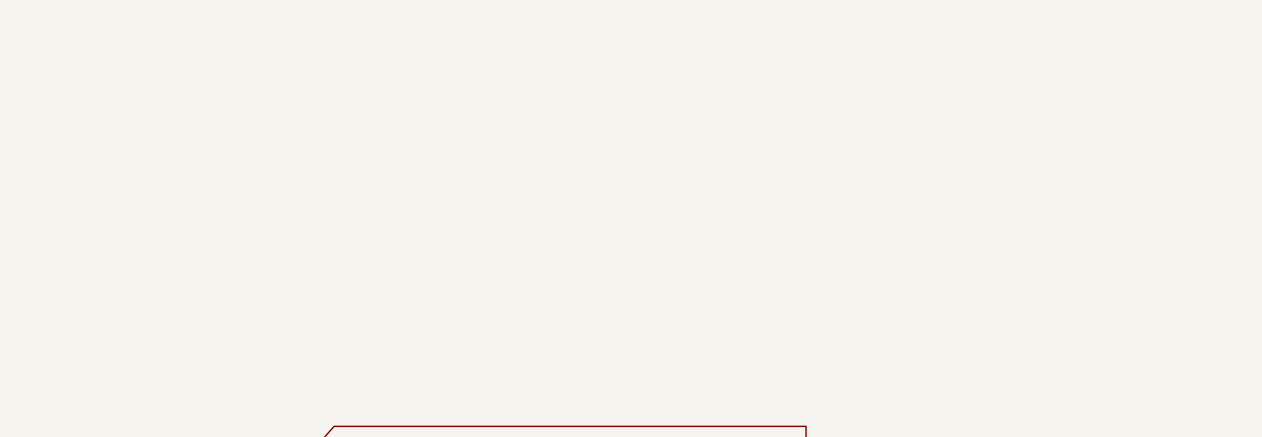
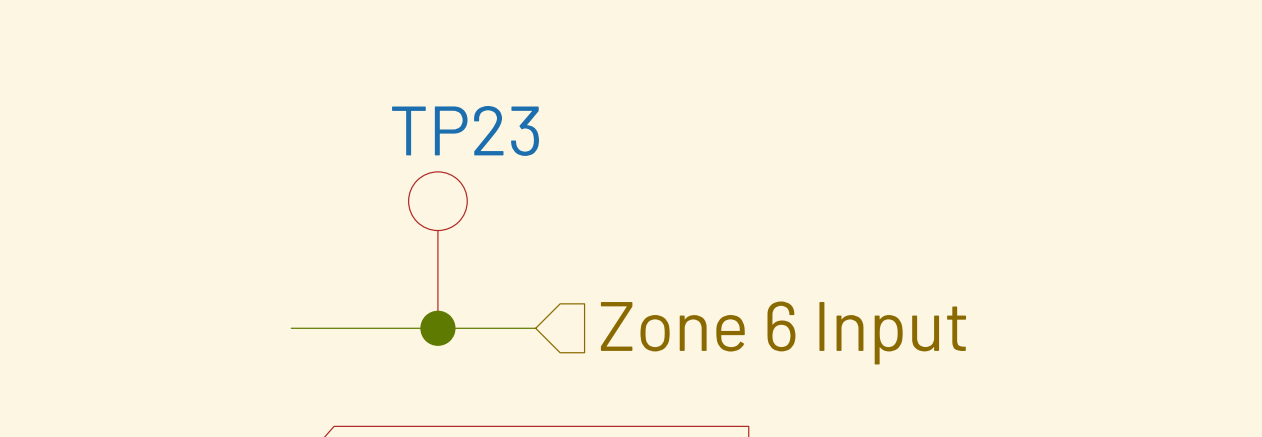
TP23: none -> (437, 250)
wire: none -> (291, 328) (535, 328)
junction: none -> (437, 328)
hierarchical label: none -> Zone 6 Input (783, 332)

